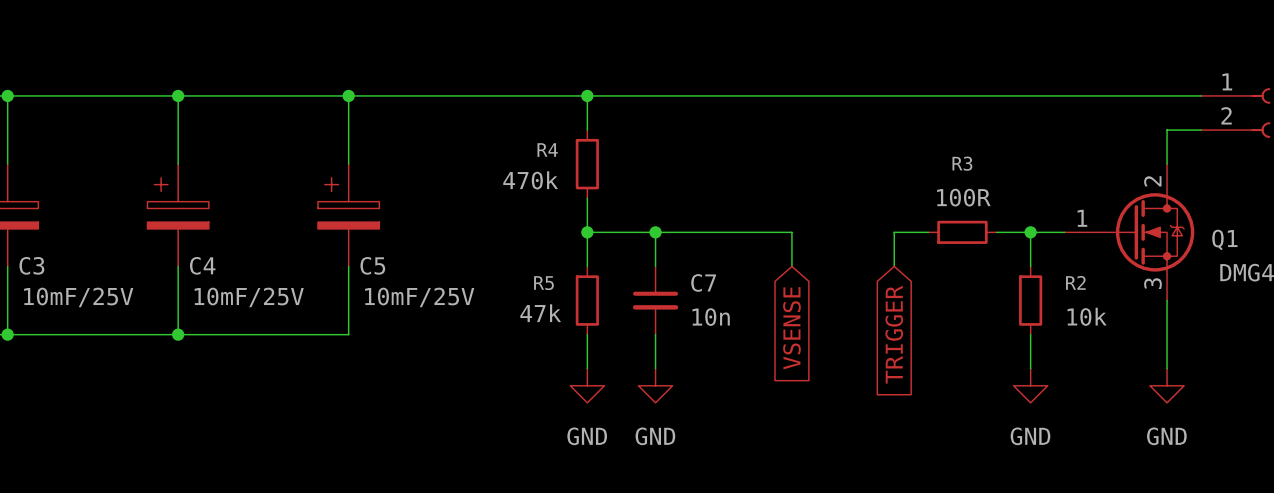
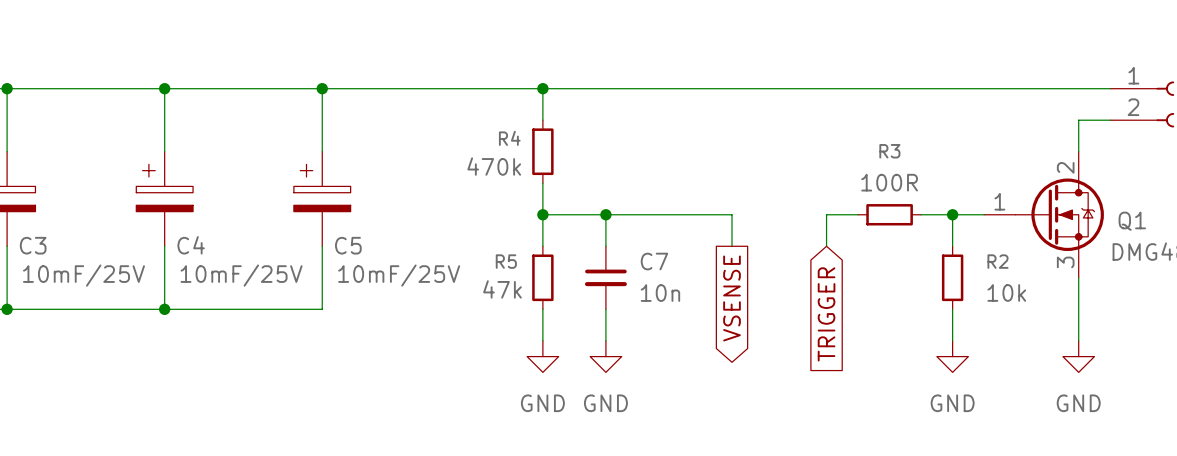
global label shape: input (791, 328) -> output (732, 298)

